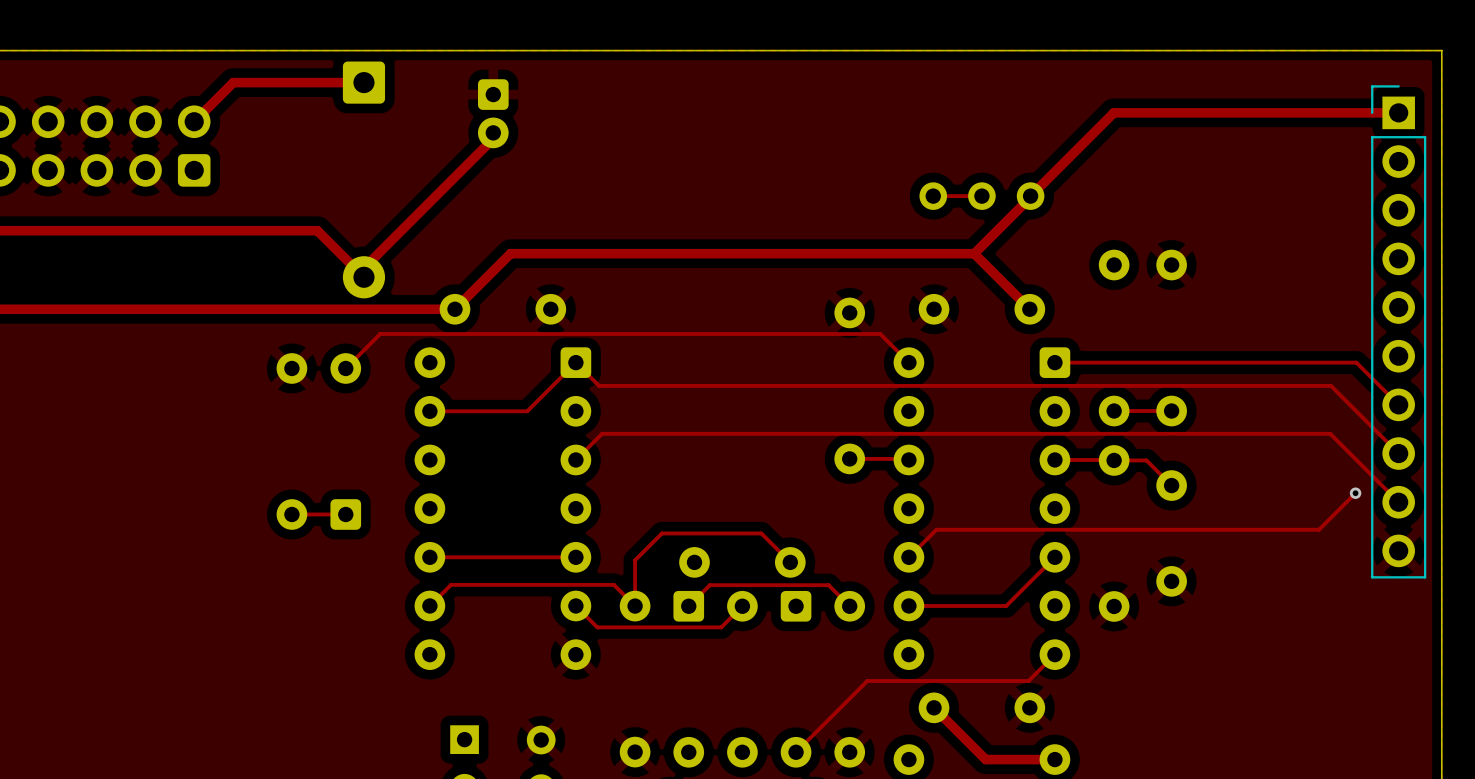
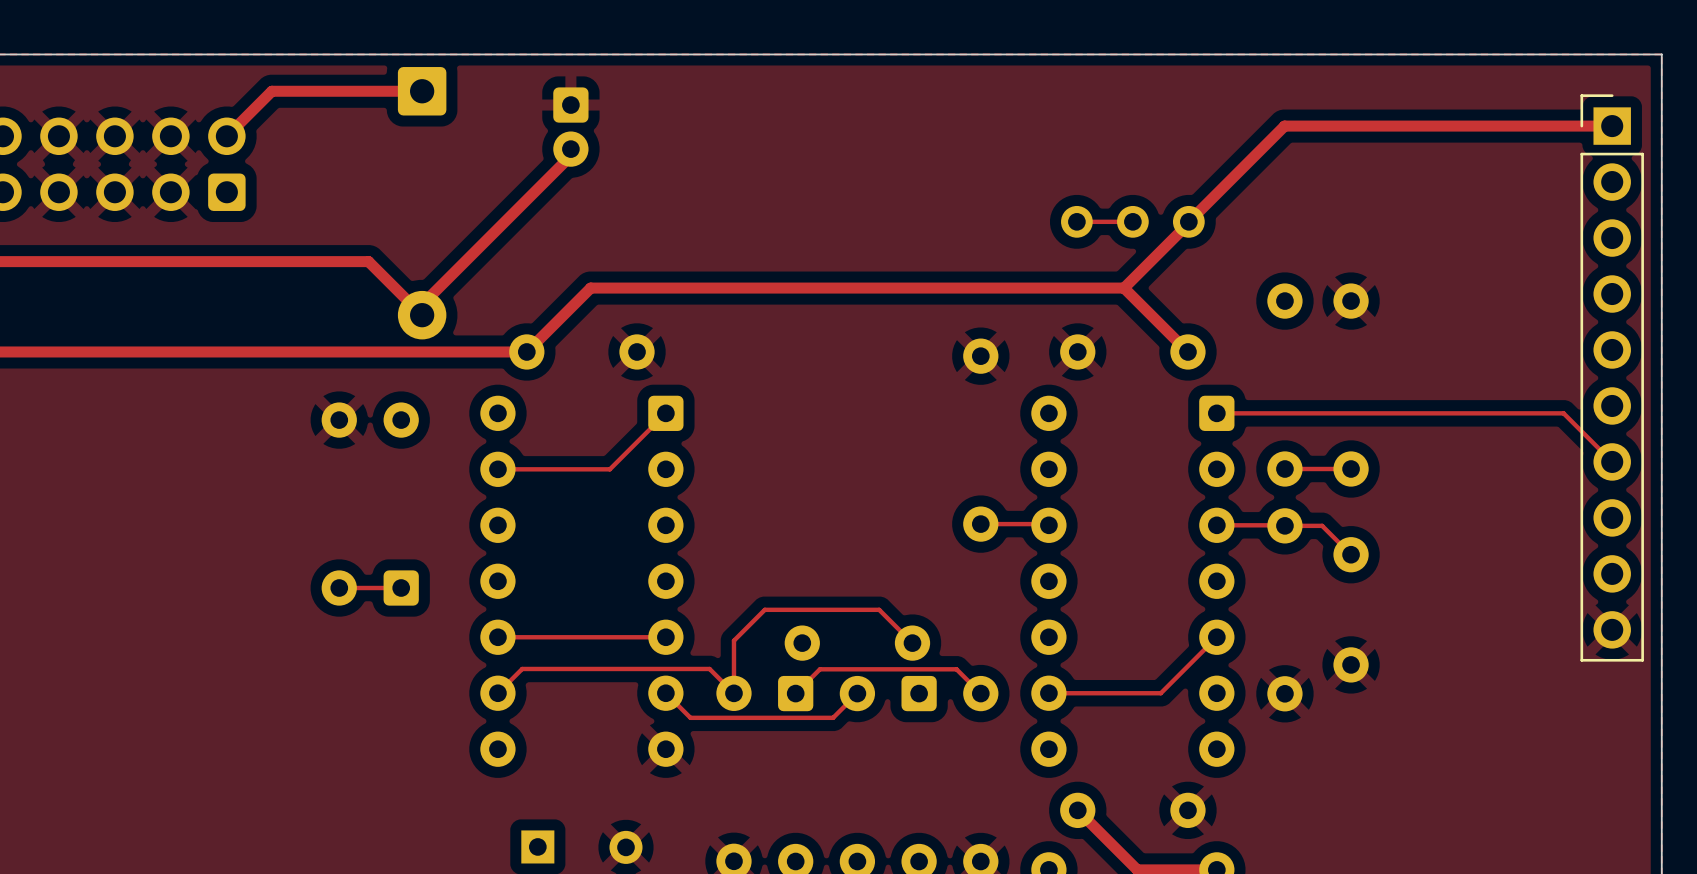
track: (575, 362) (599, 385) (1331, 385) (1398, 453) -> none
track: (908, 362) (880, 334) (380, 334) (345, 368) -> none
track: (575, 459) (602, 433) (1330, 433) (1398, 502) -> none
track: (1355, 493) (1319, 529) (936, 529) (908, 557) -> none
via: (1355, 493) -> none
track: (1054, 654) (1028, 681) (867, 681) (796, 752) -> none

